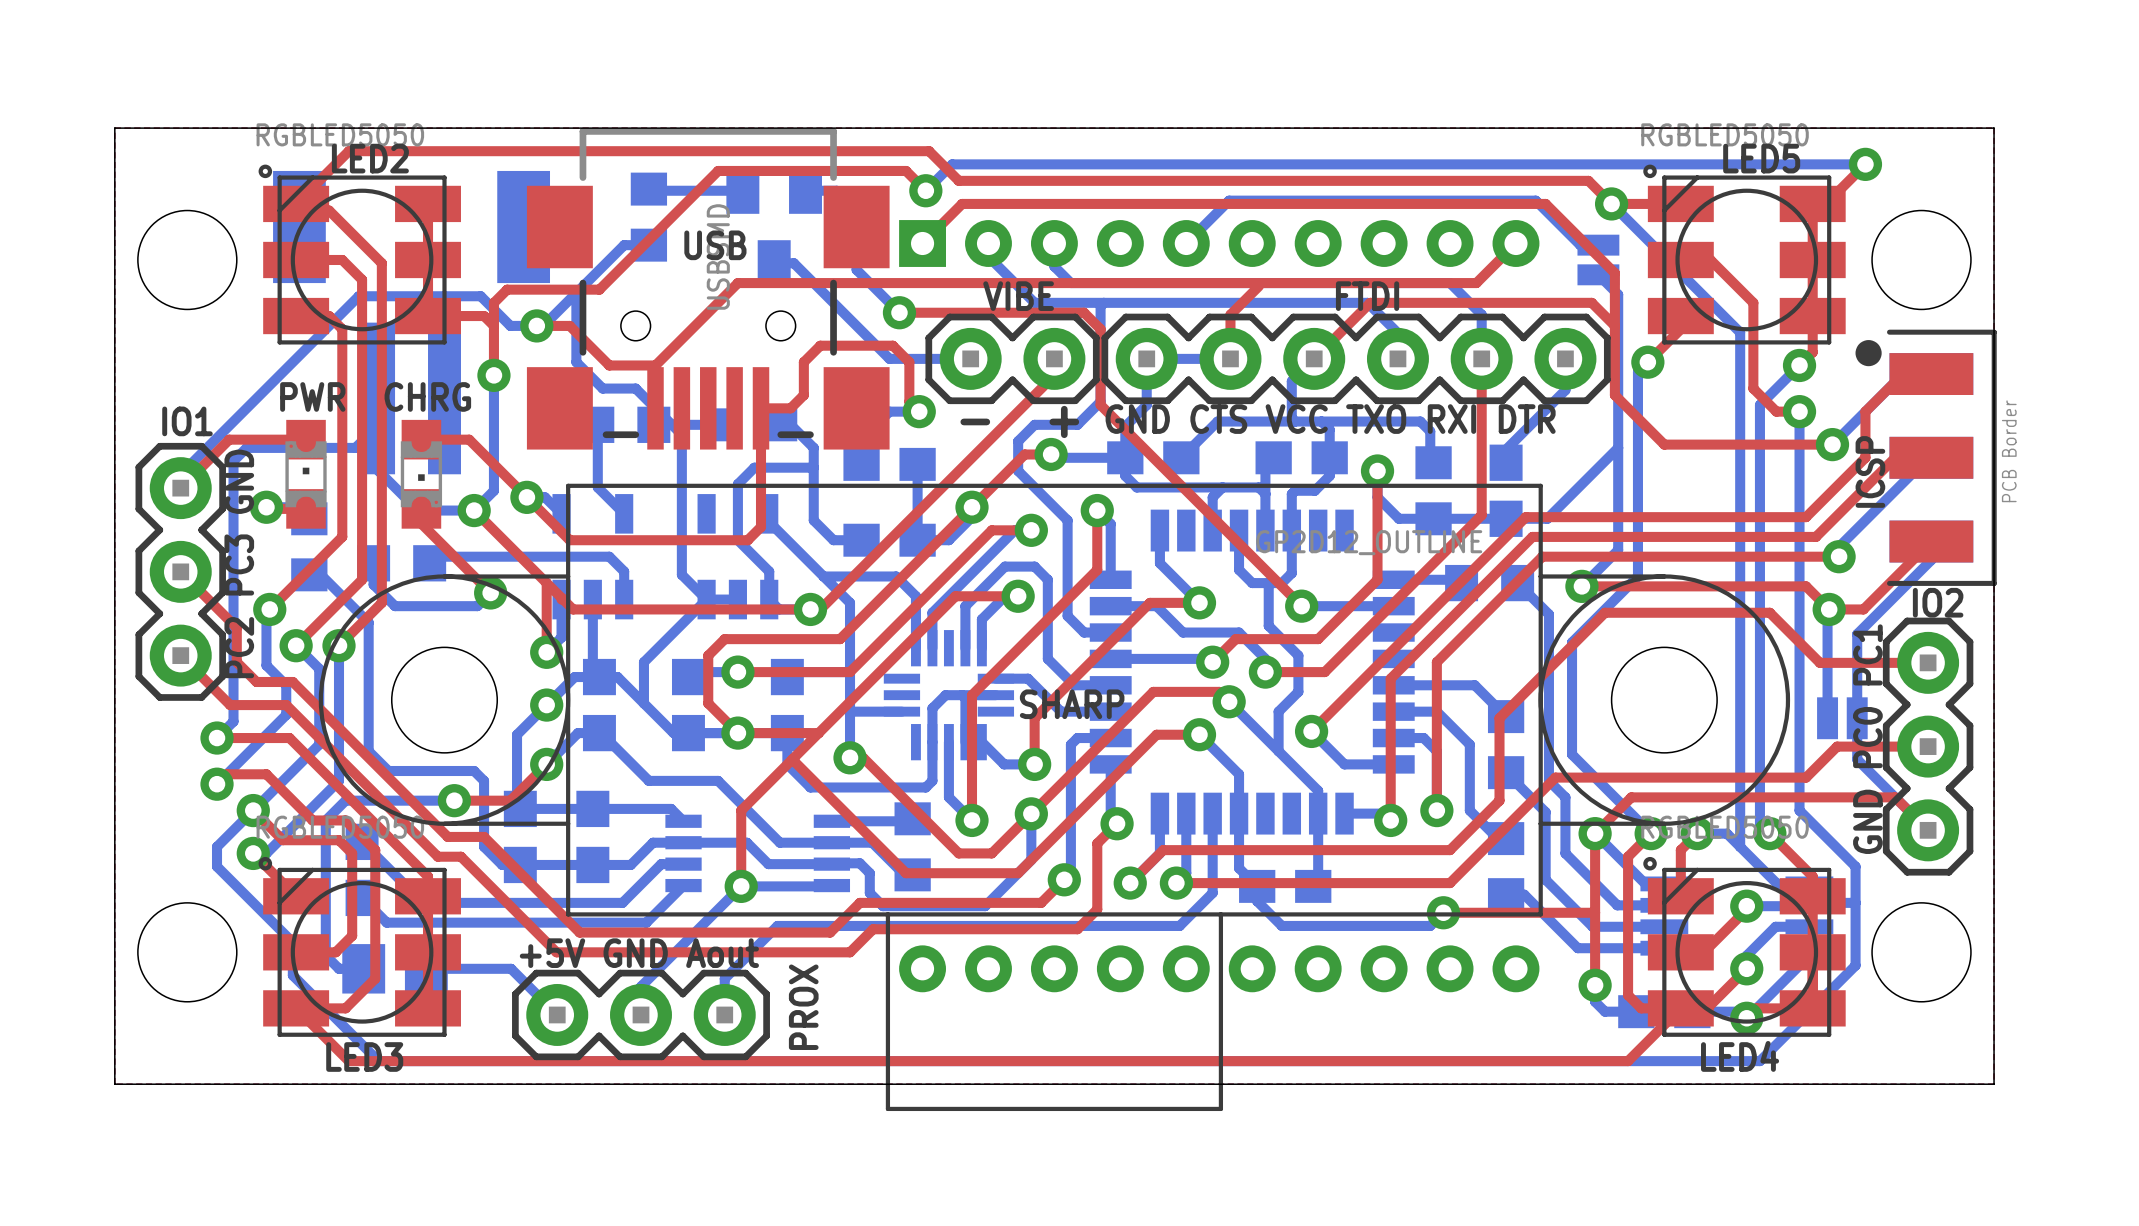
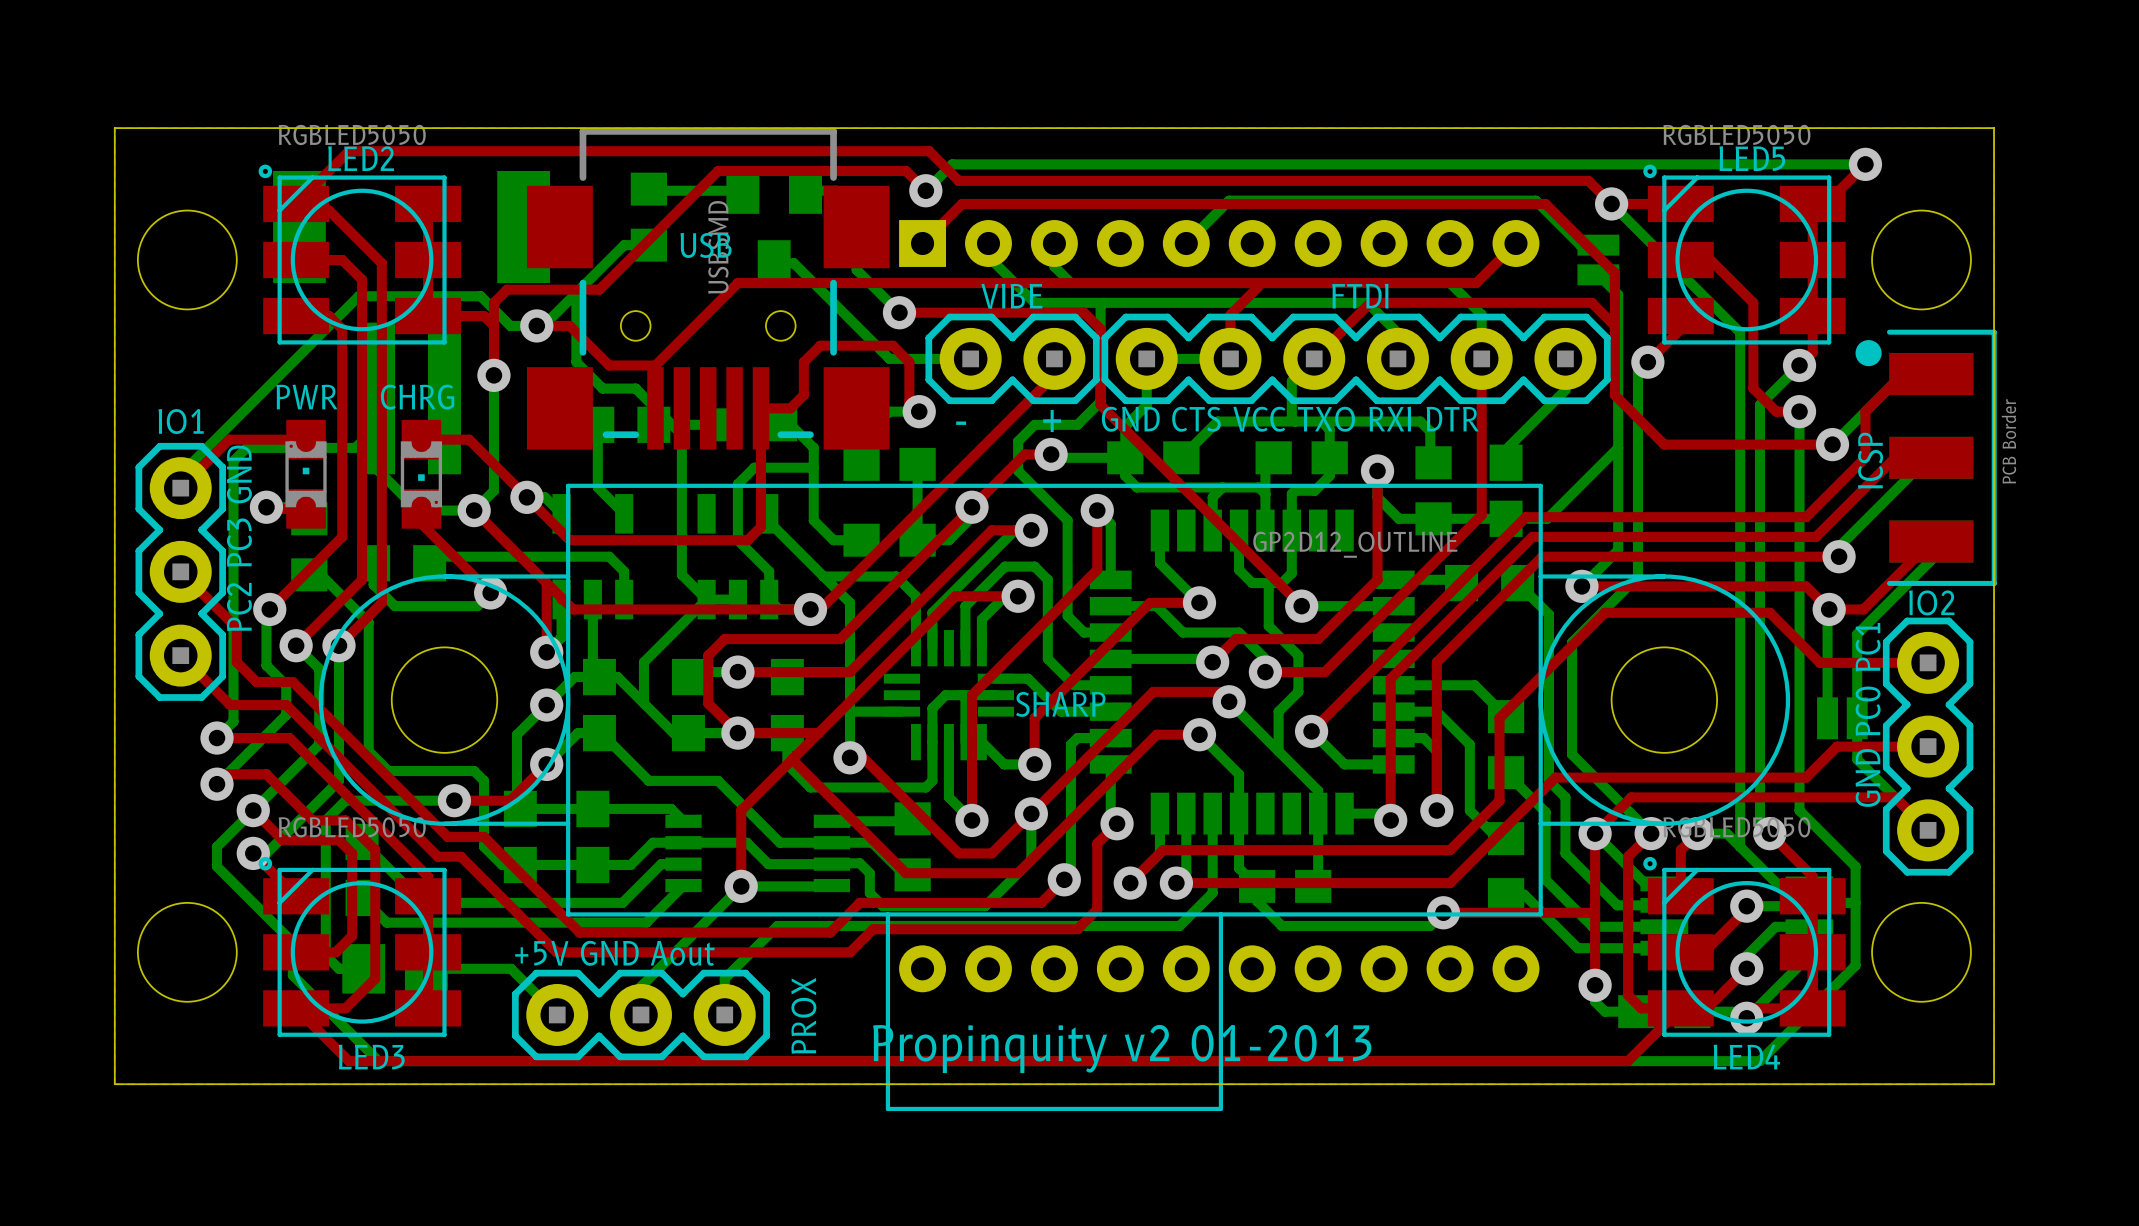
text: none -> Propinquity v2 01-2013 (1122, 1048)

